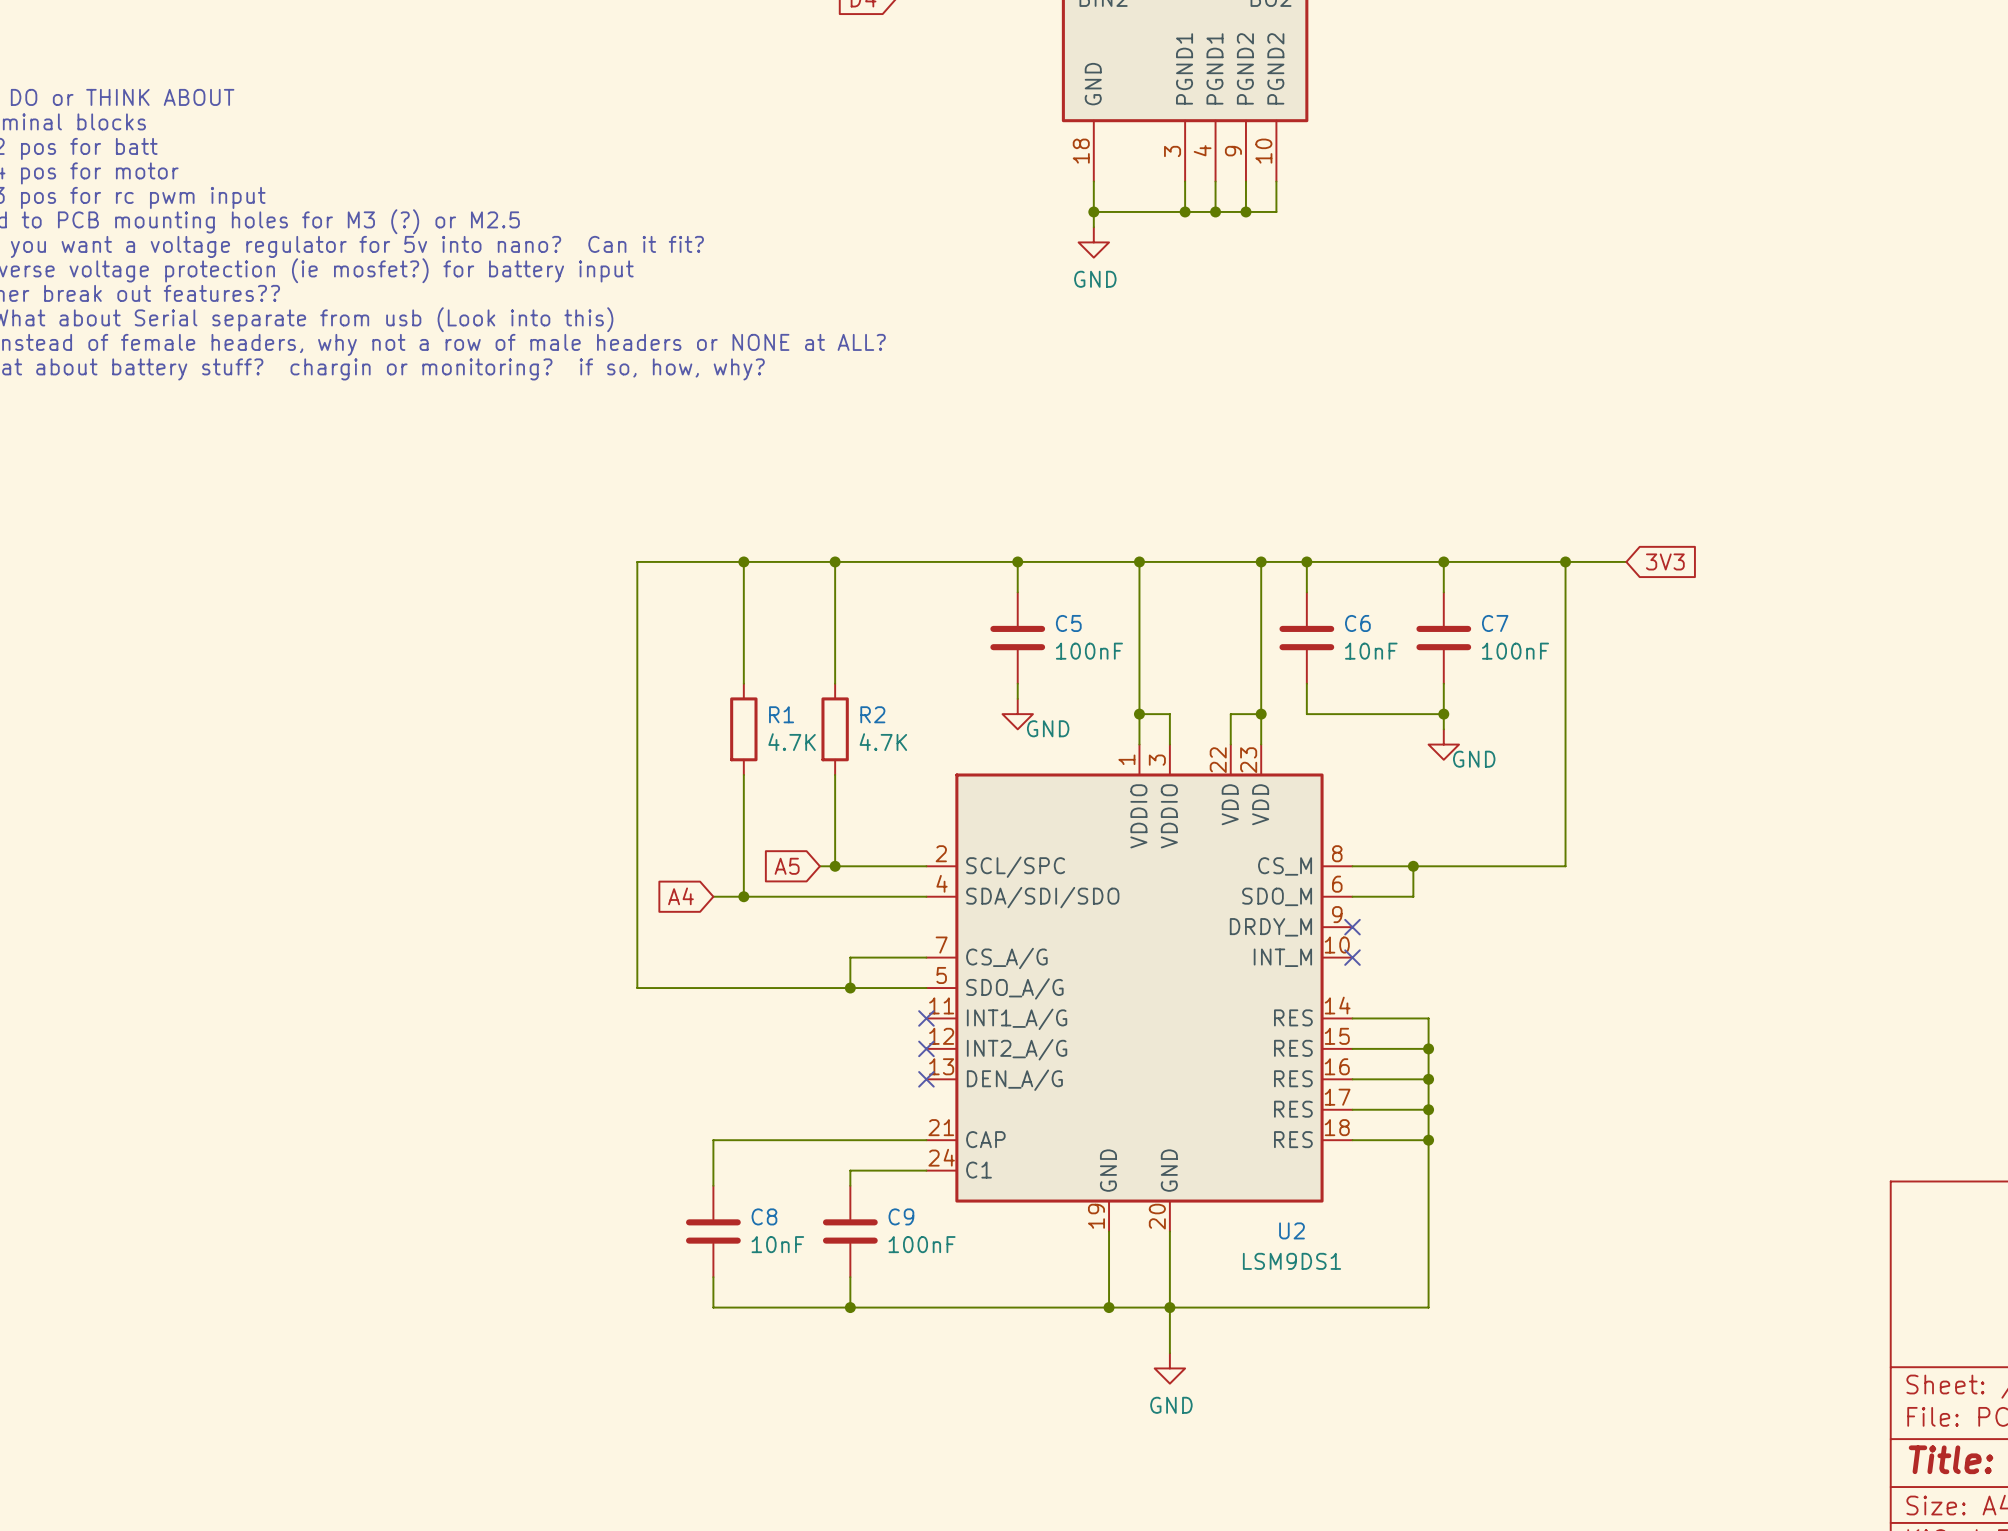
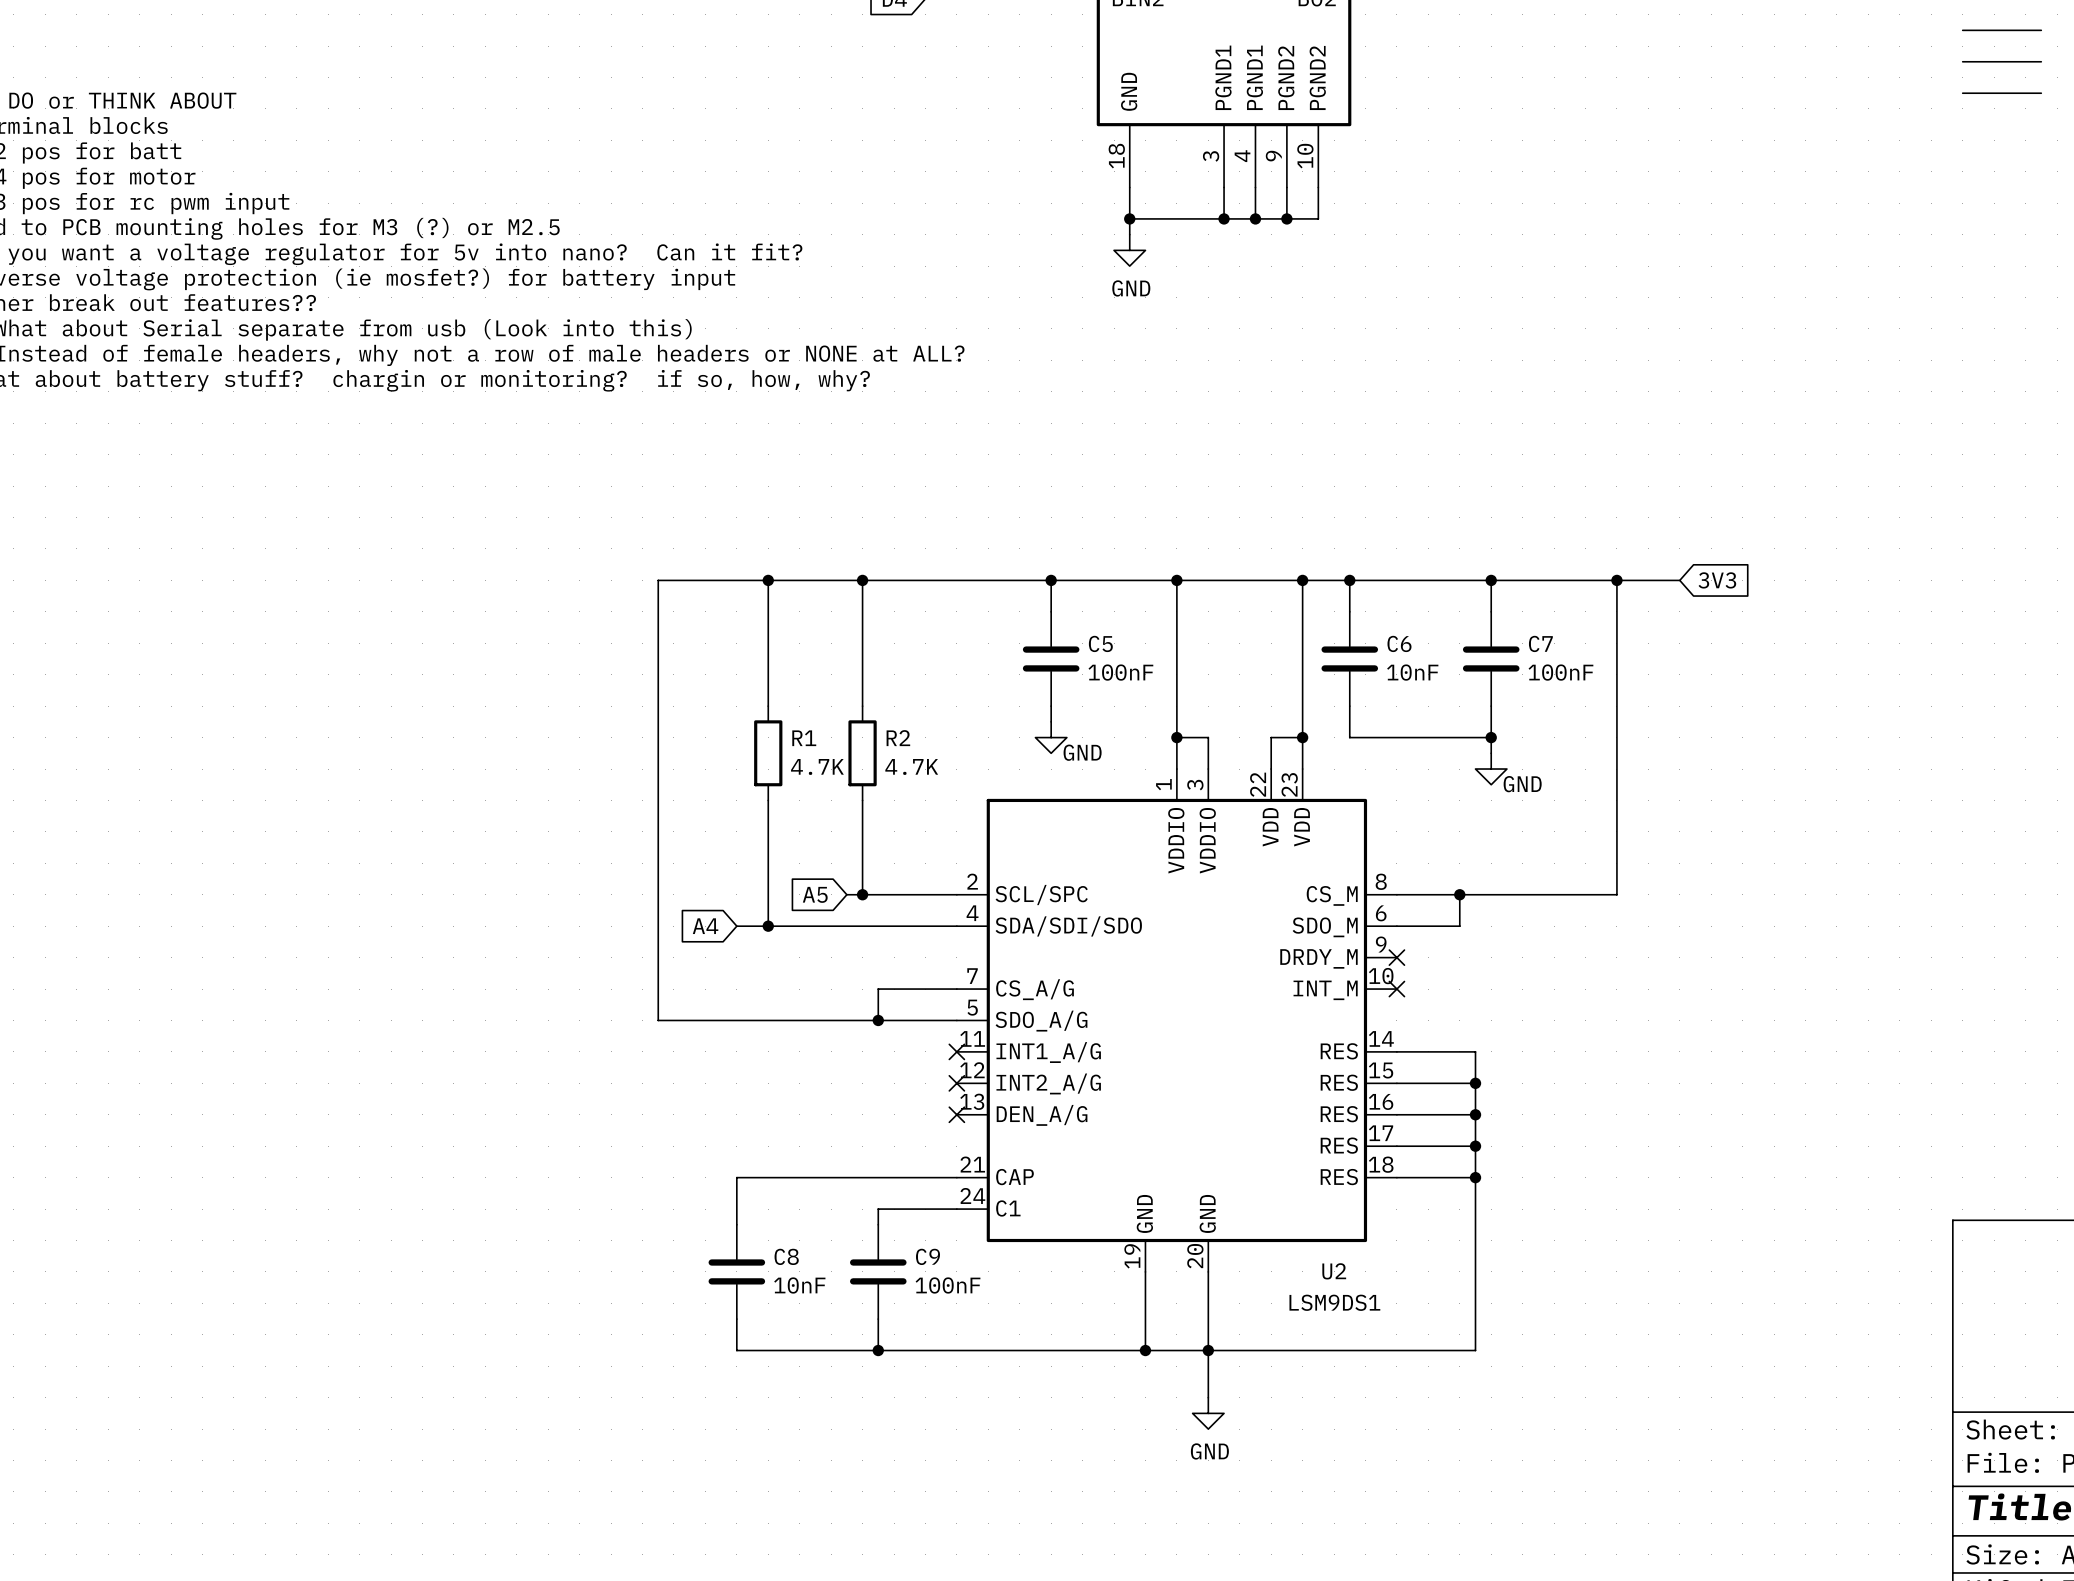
wire: none -> (1962, 30) (2041, 30)
wire: none -> (1962, 61) (2041, 61)
wire: none -> (1962, 93) (2041, 93)

